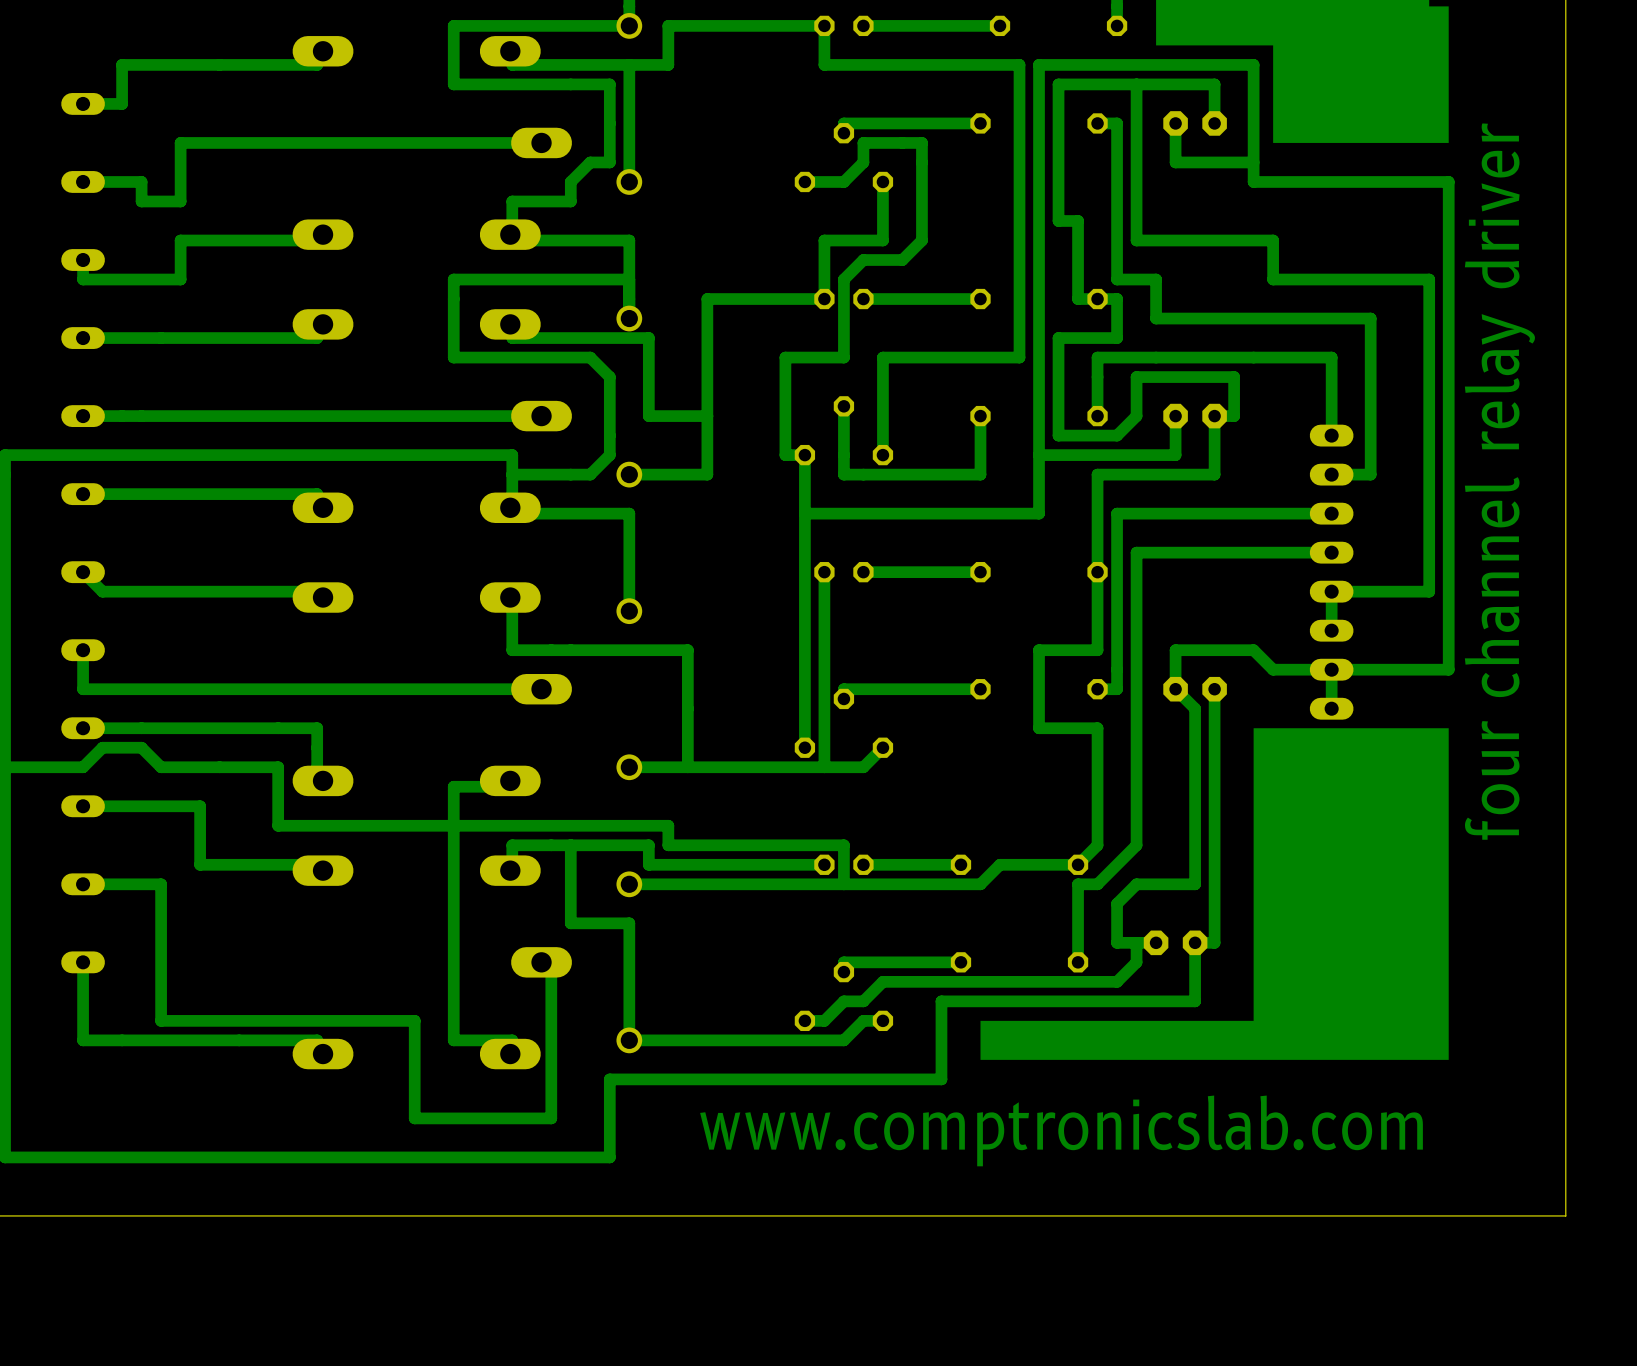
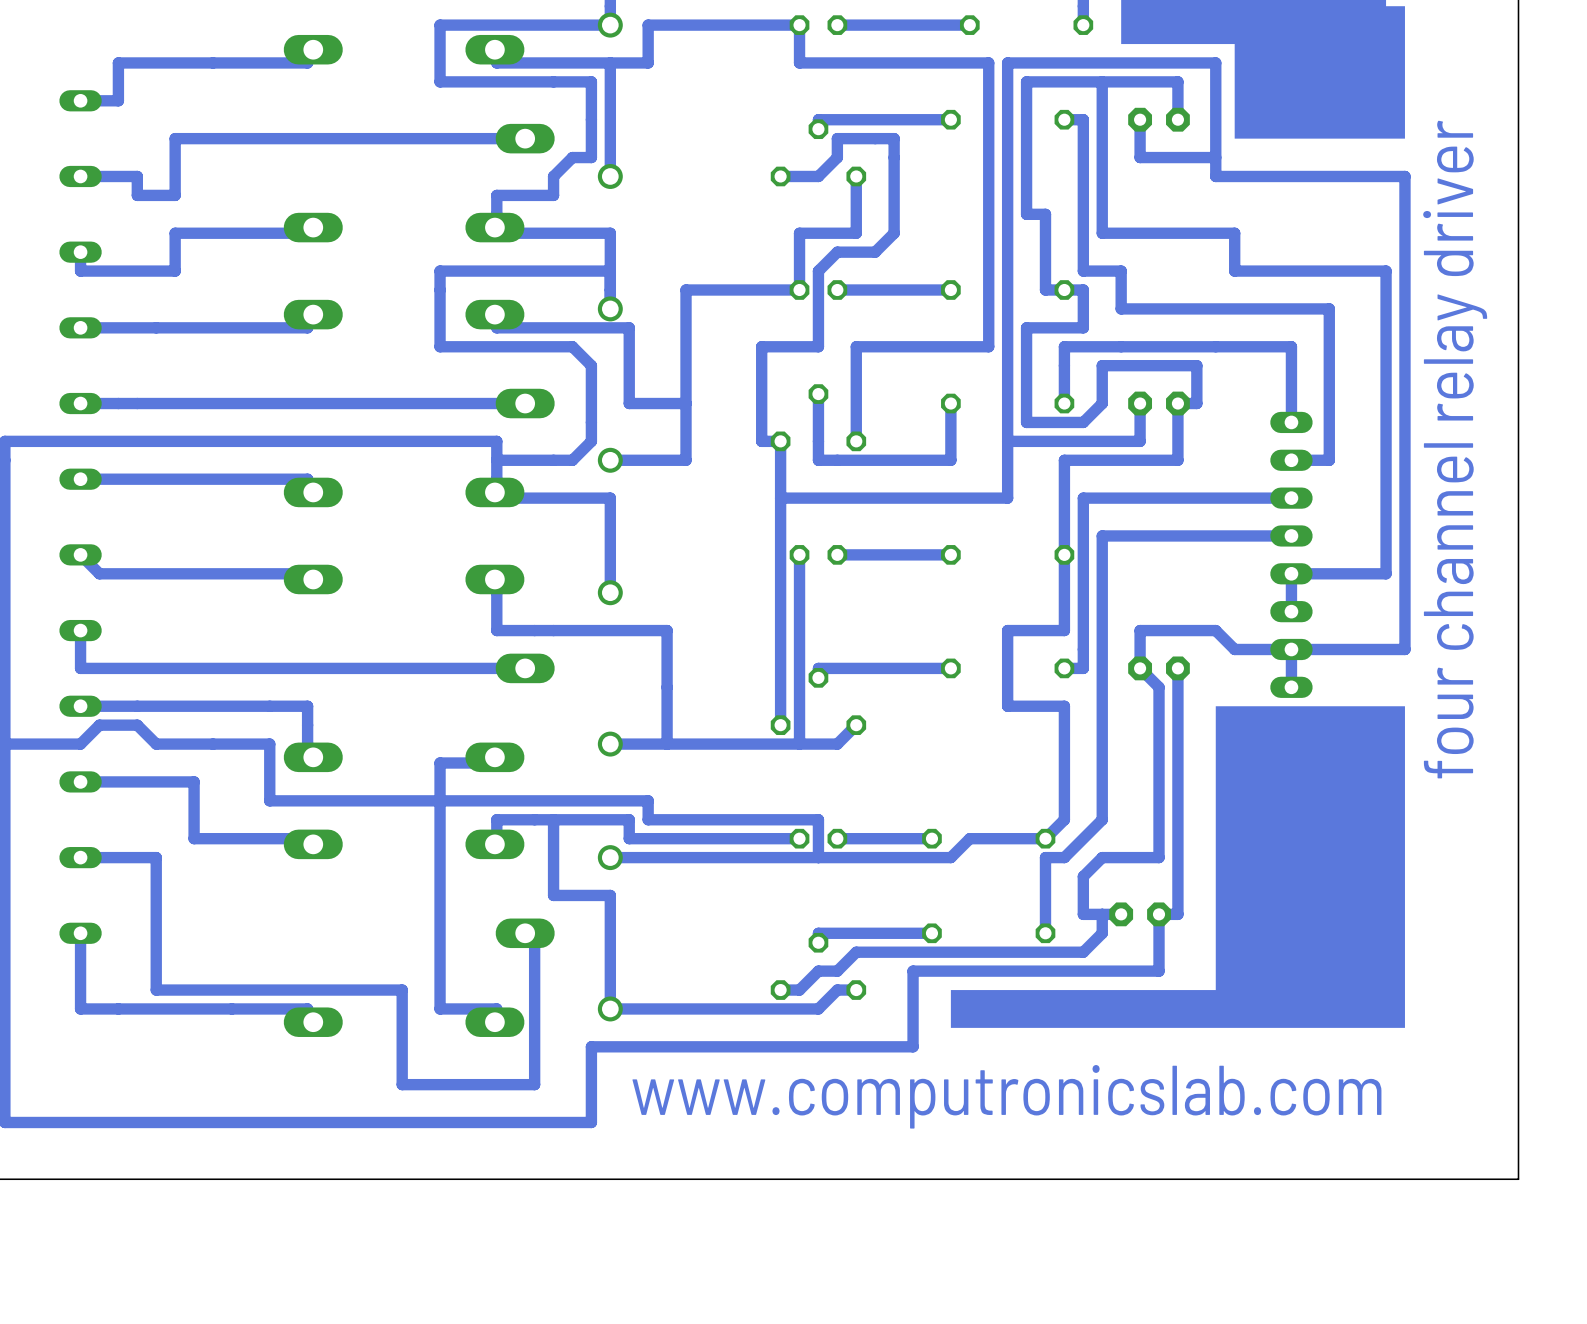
text: www.comptronicslab.com (1061, 1130) -> www.computronicslab.com (1006, 1096)

